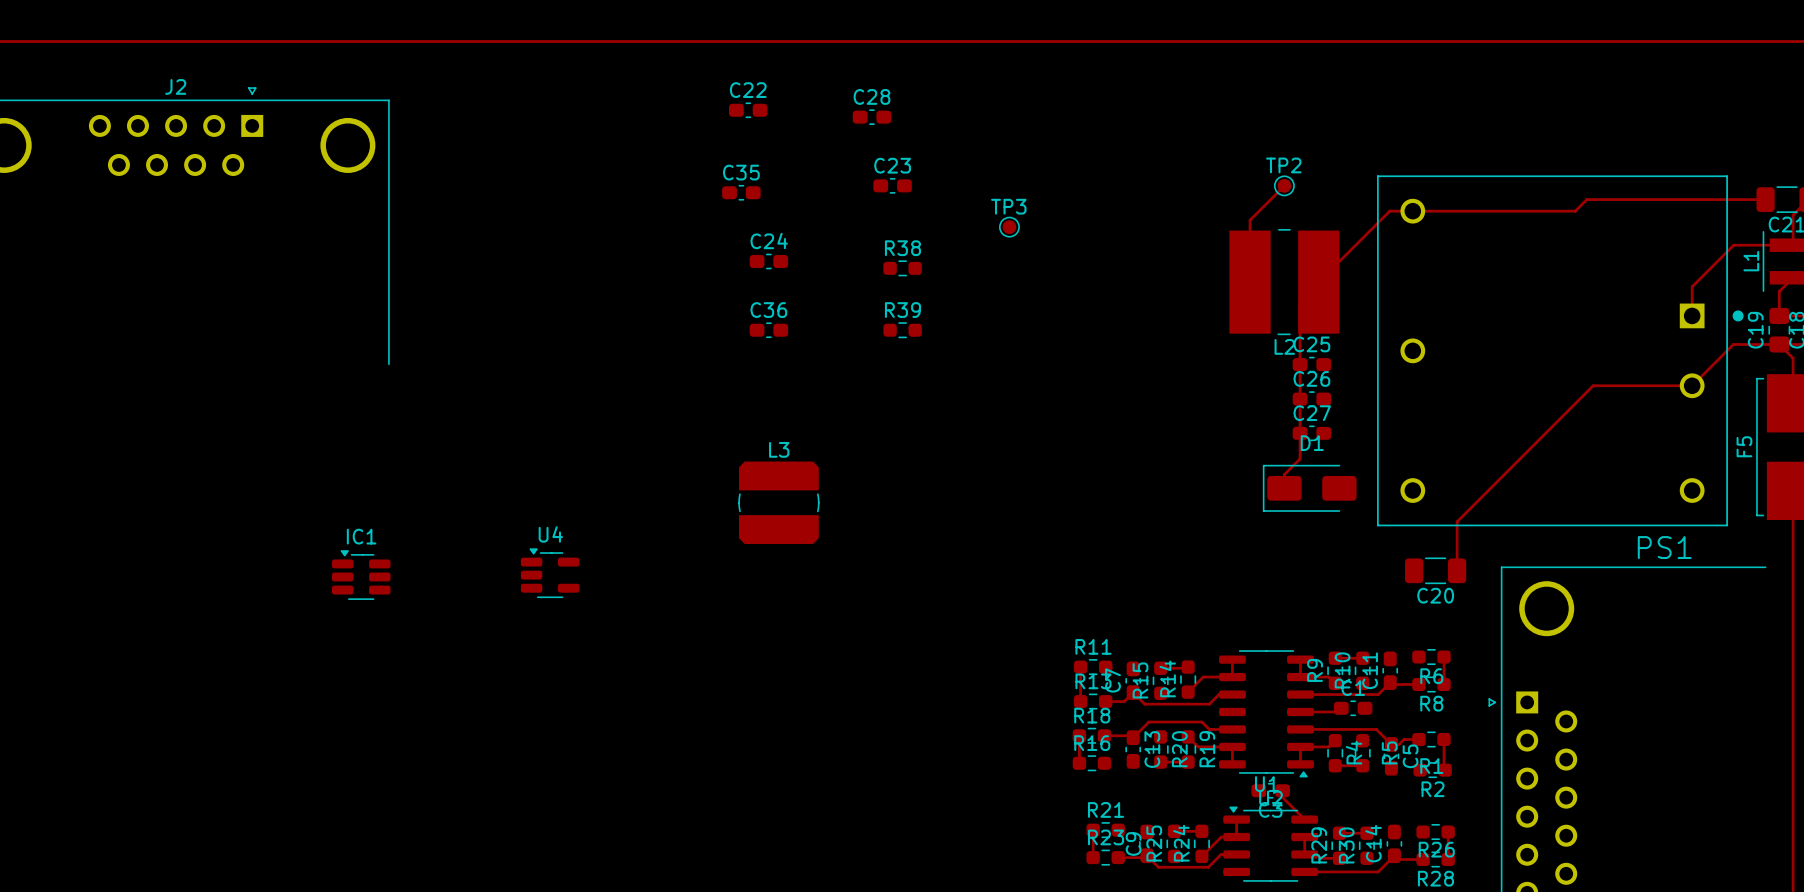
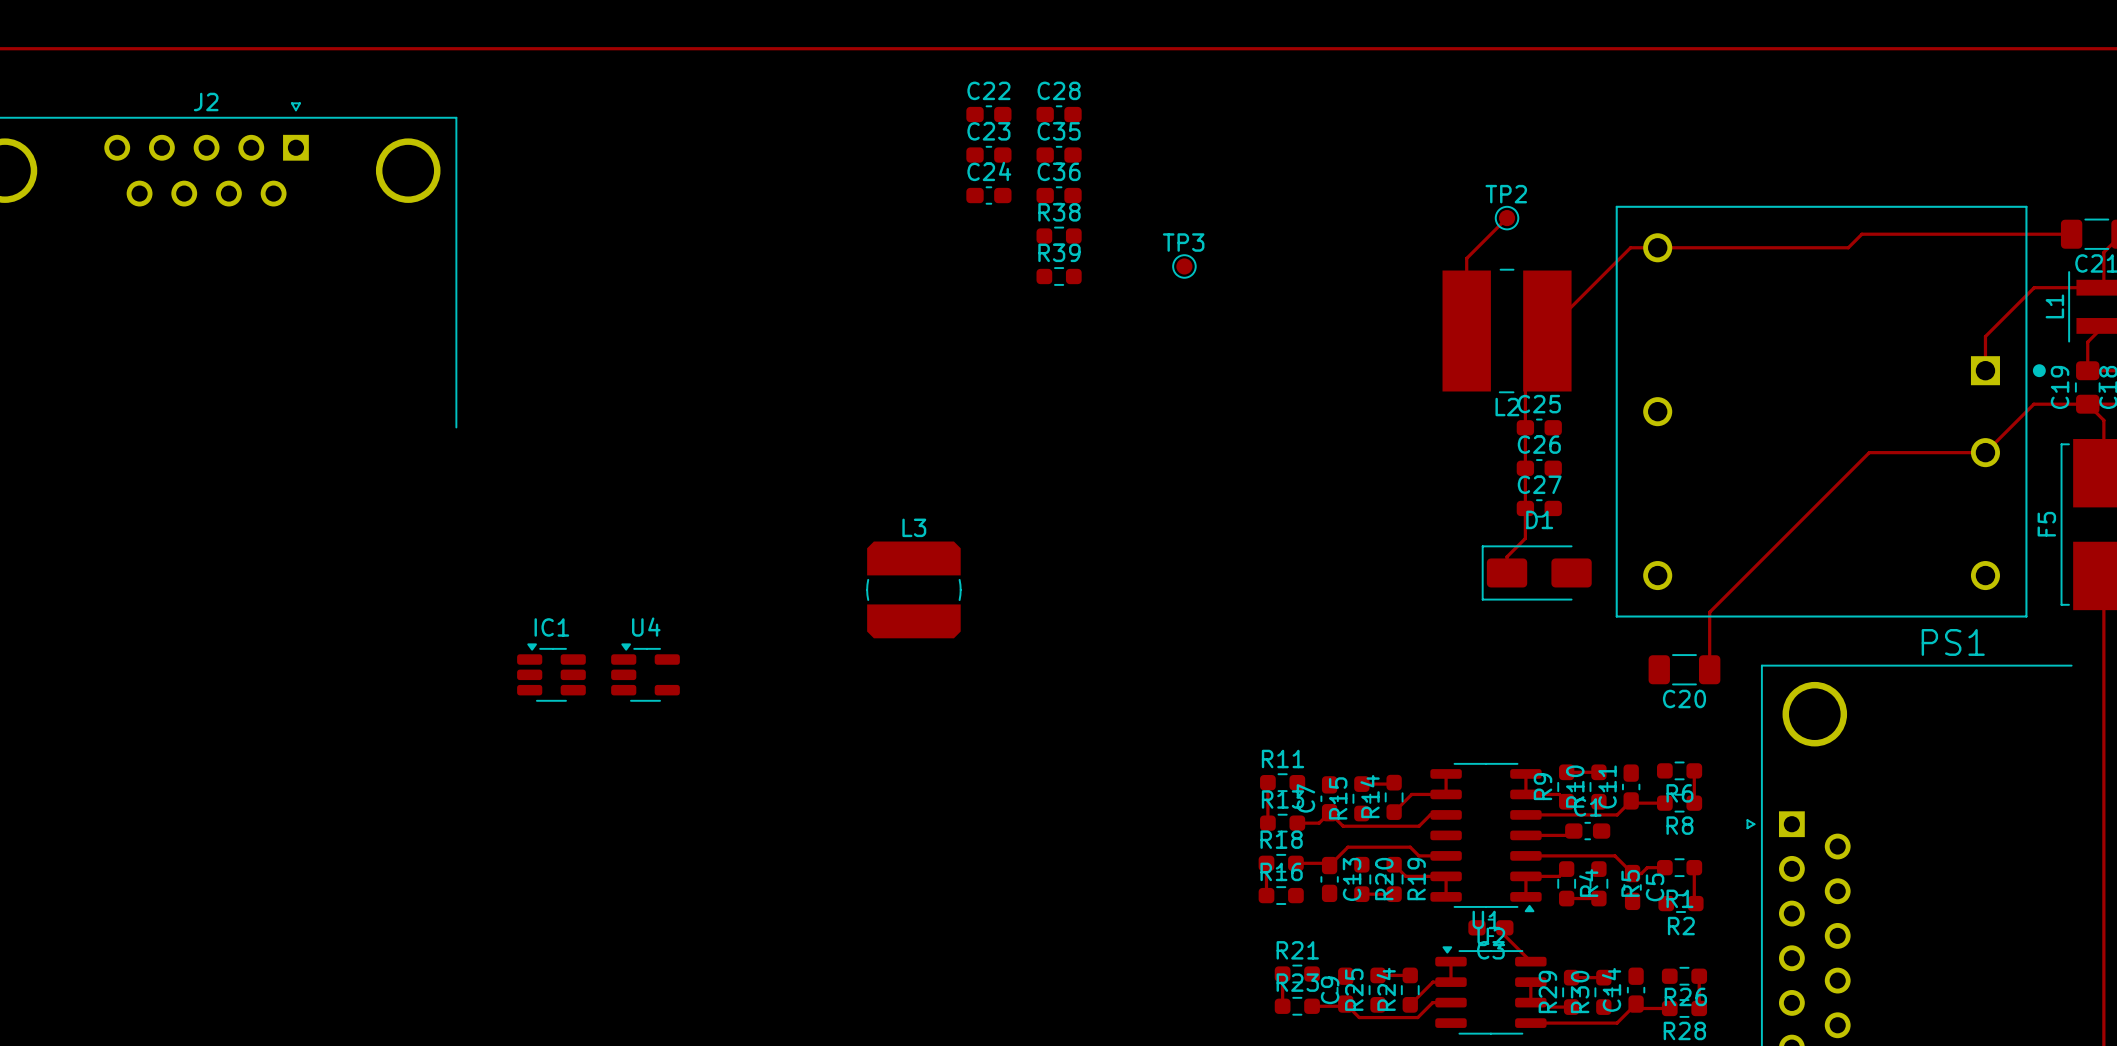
C22 position: (748, 110) -> (988, 114)
C28 position: (871, 117) -> (1059, 114)
C23 position: (892, 185) -> (988, 155)
C35 position: (741, 192) -> (1059, 155)
C24 position: (768, 261) -> (988, 195)
R38 position: (902, 268) -> (1059, 236)
C36 position: (768, 330) -> (1059, 195)
R39 position: (902, 330) -> (1059, 276)
IC1 position: (361, 575) -> (551, 672)

